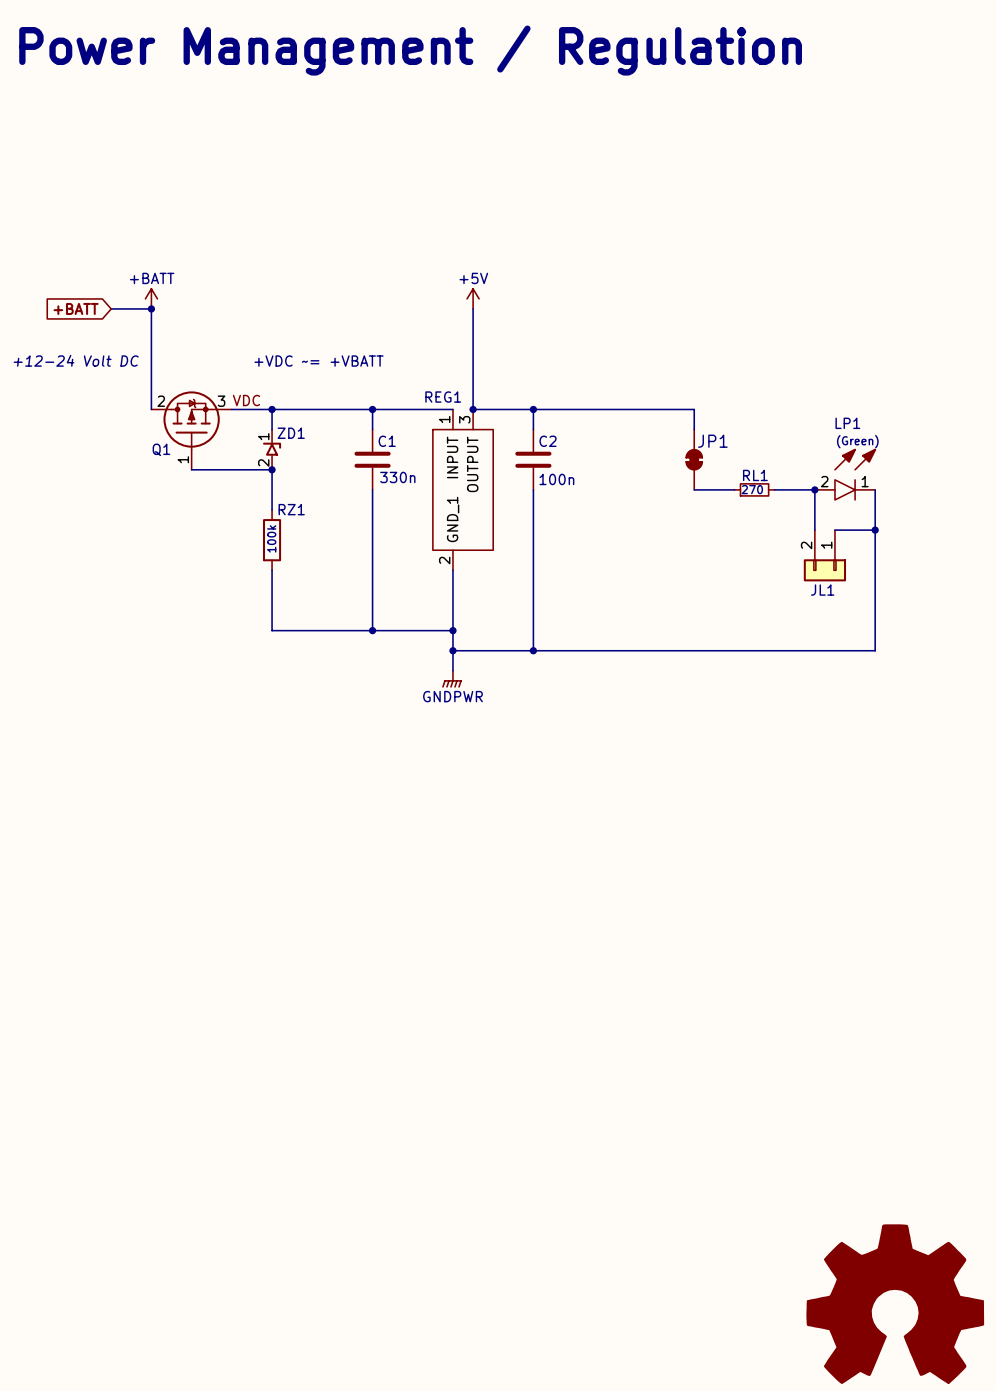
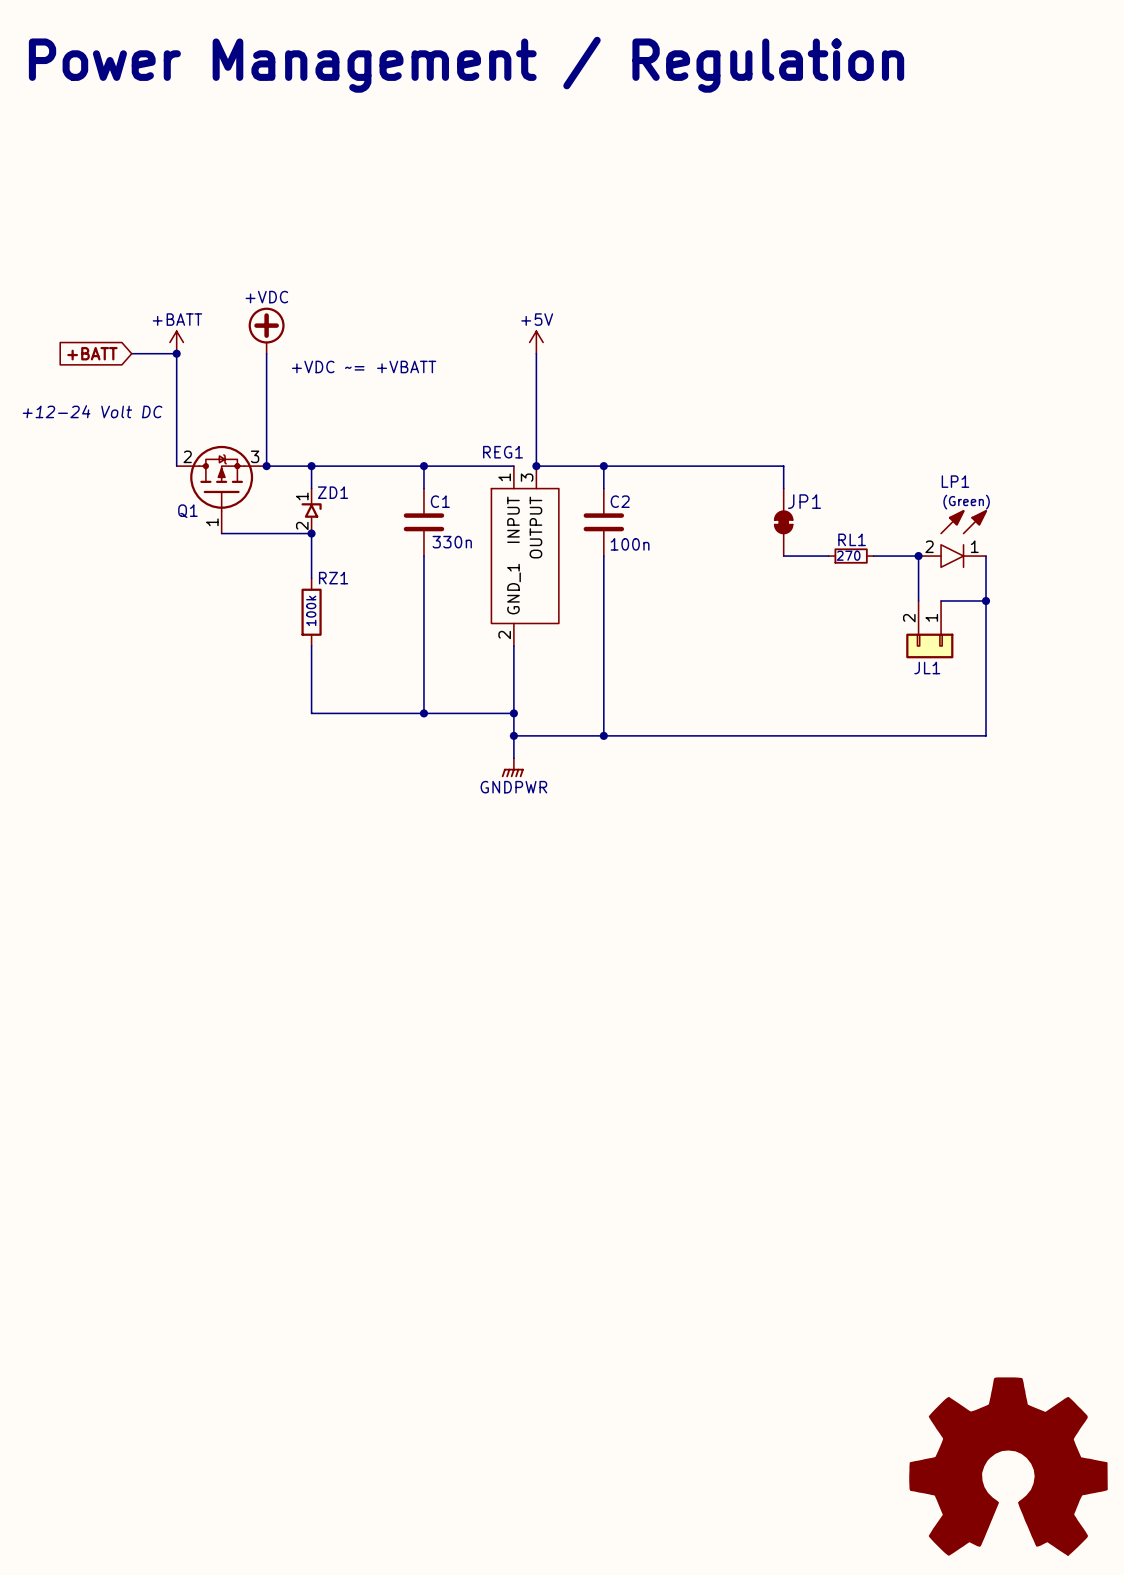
power symbol: none -> +VDC (266, 330)
wire: none -> (266, 353) (266, 466)
text position: +VDC ~= +VBATT (319, 361) -> +VDC ~= +VBATT (364, 366)
label: VDC (246, 400) -> none
junction: none -> (266, 466)

